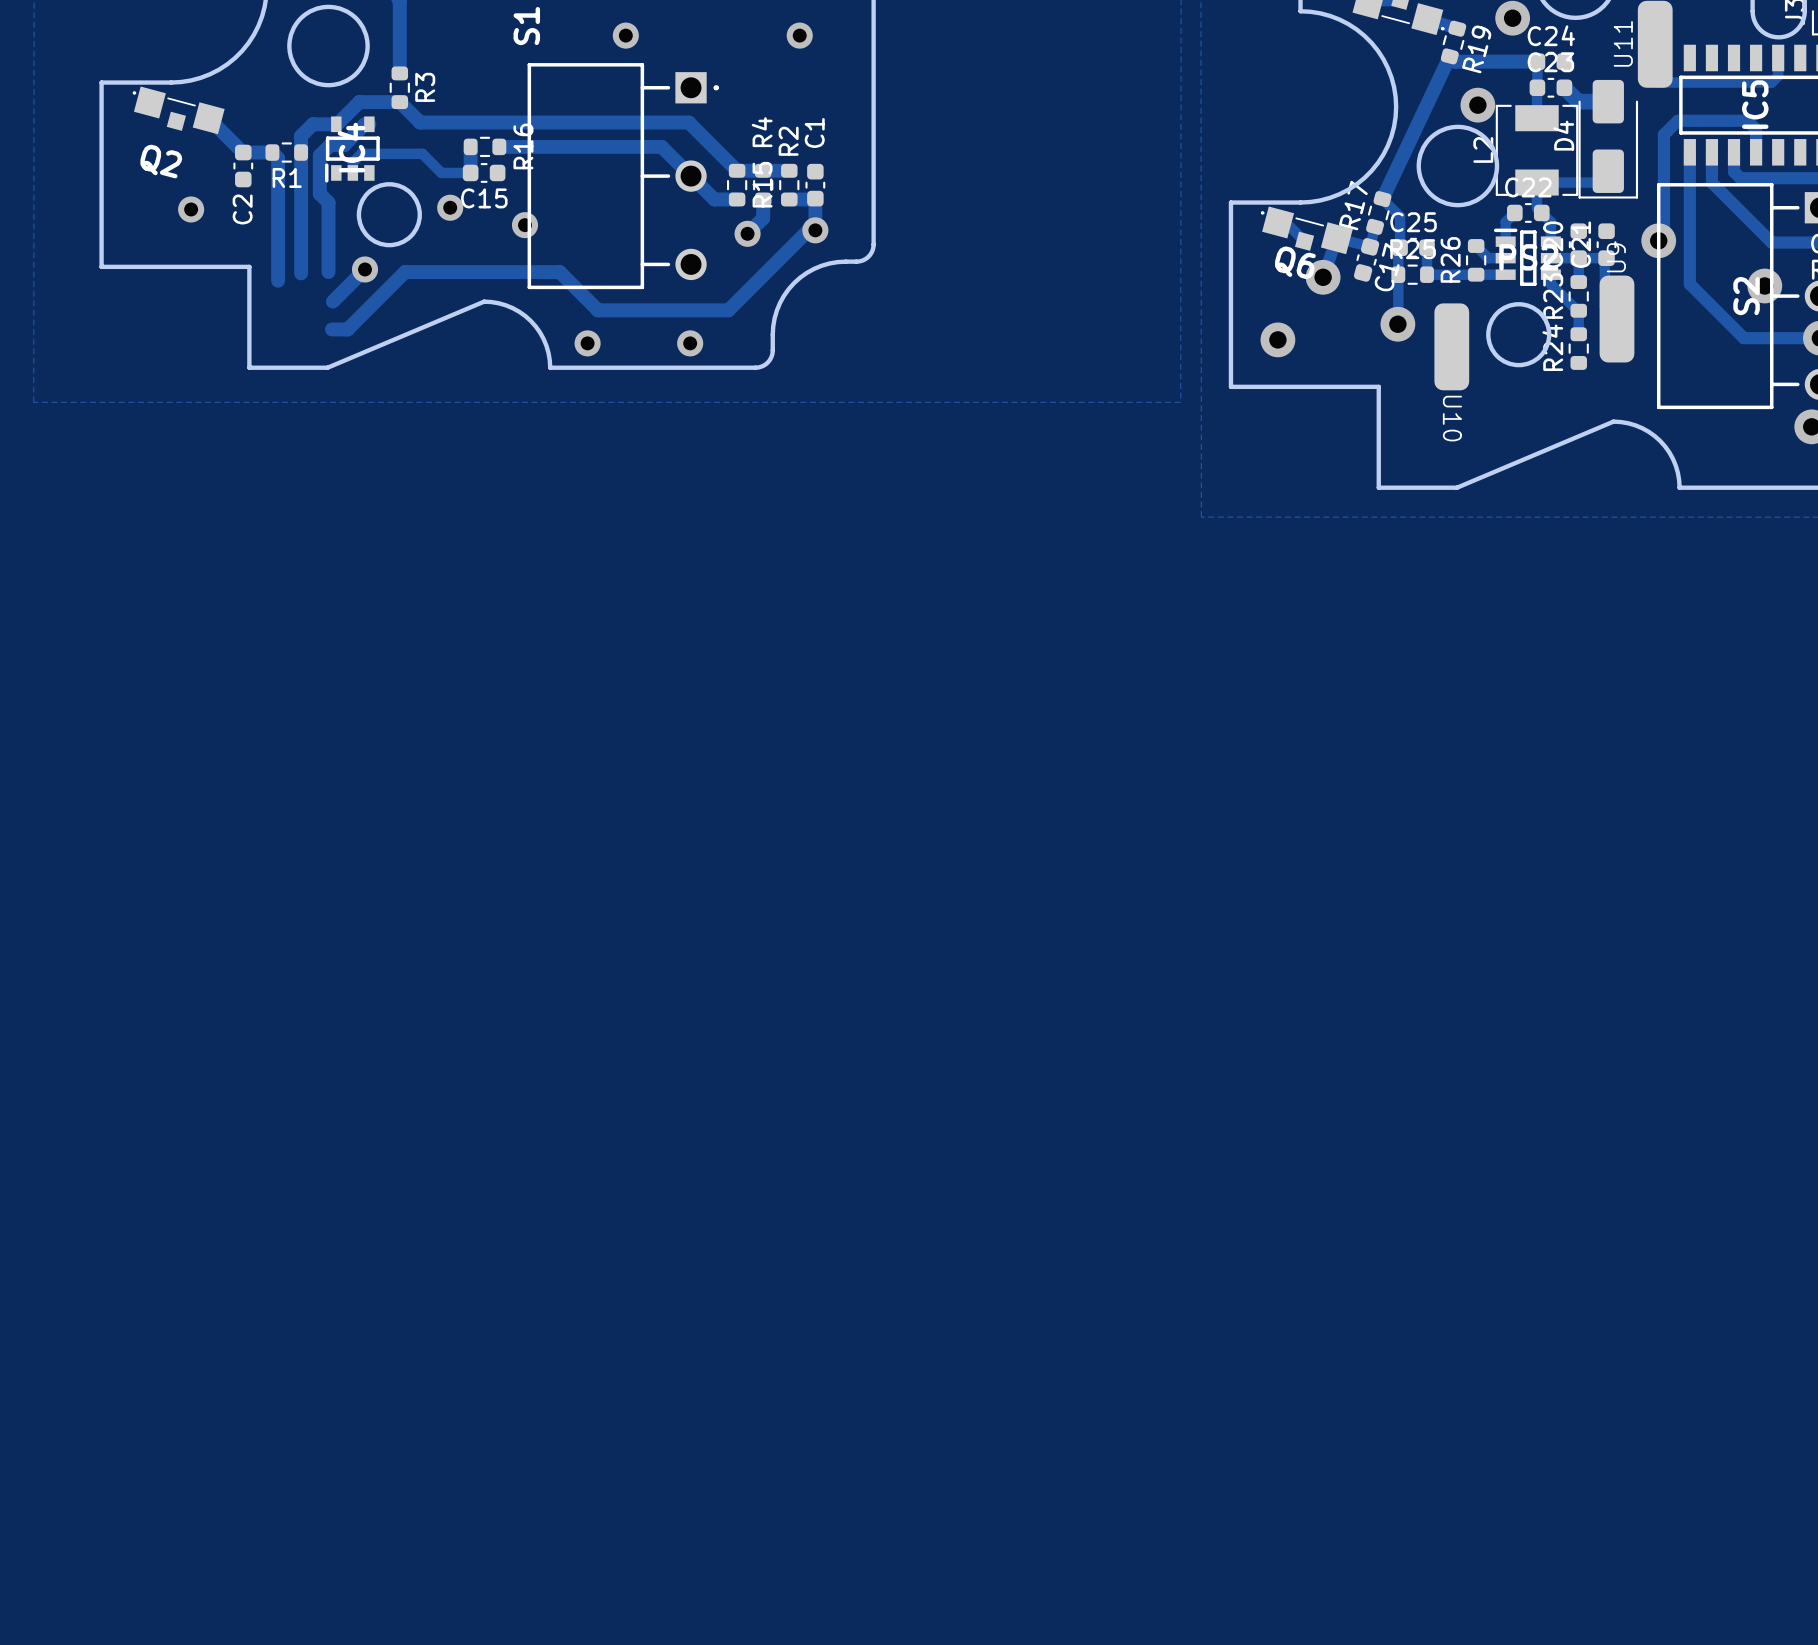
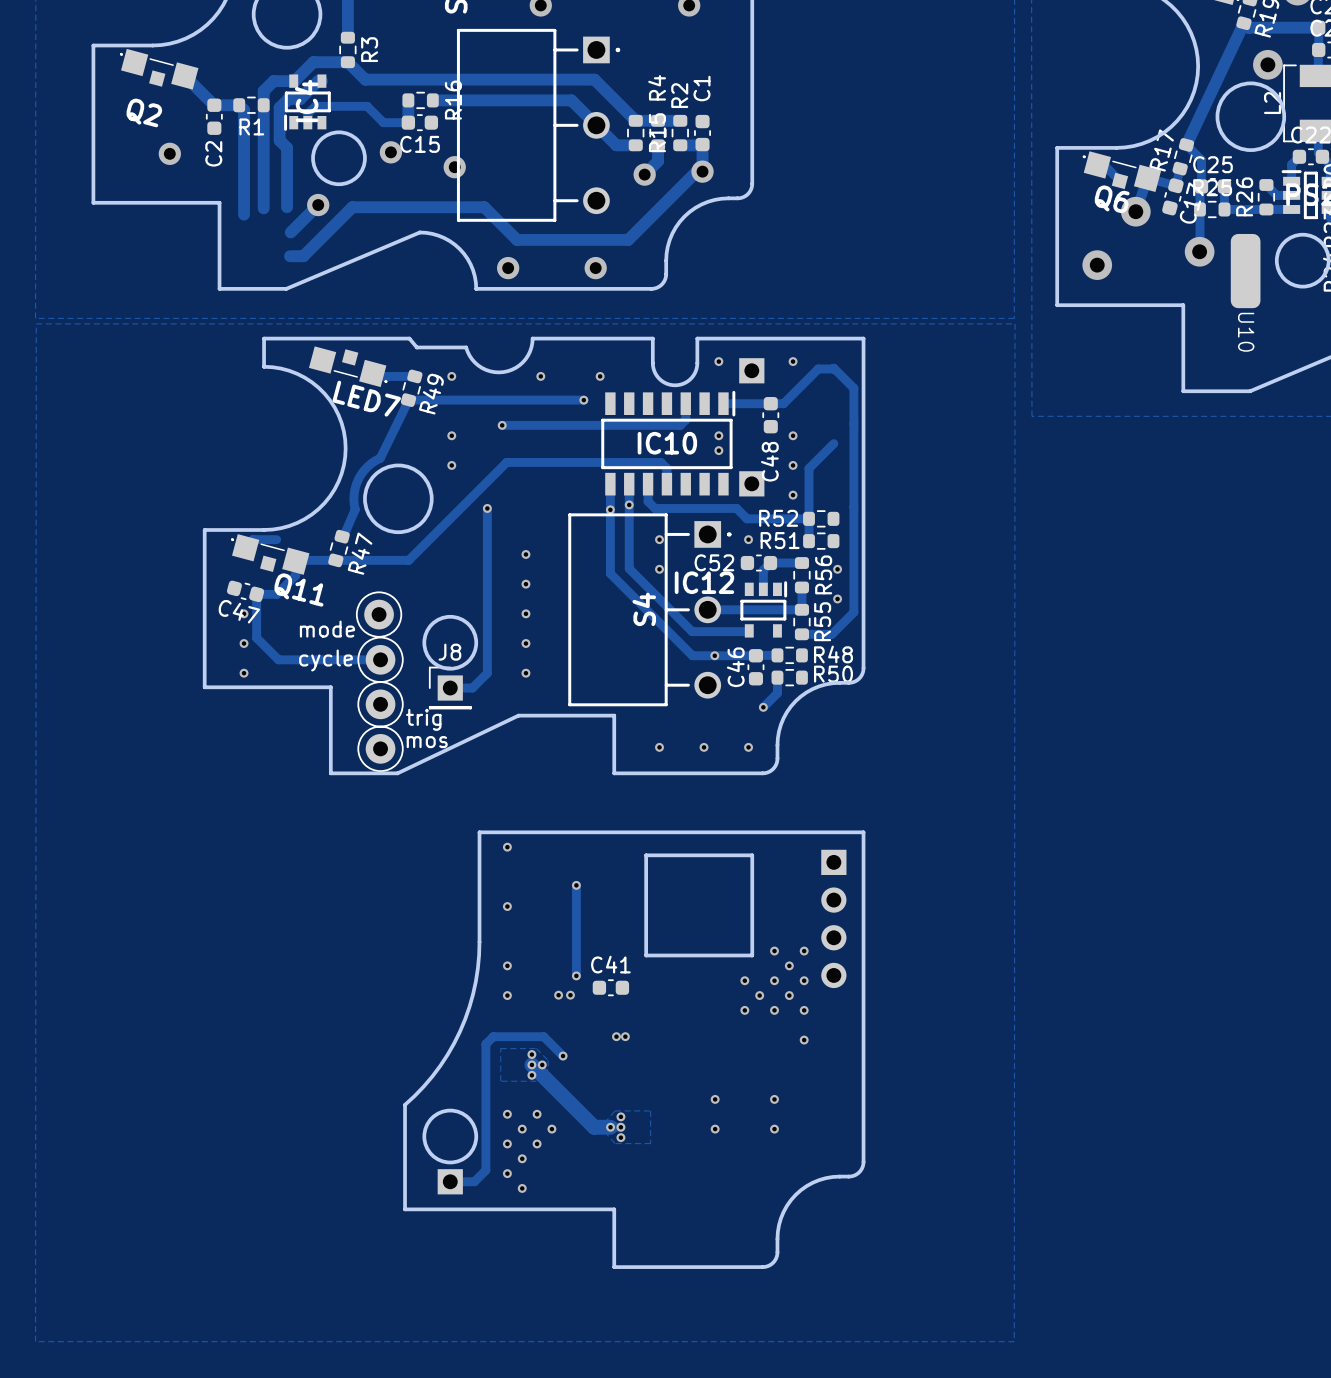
zone outline: none -> (36, 323) (35, 1341) (1014, 1341) (1015, 323) (36, 323)
board edge: none -> (264, 338) (409, 338) (416, 347) (466, 347) (472, 359) (478, 365) (485, 369) (498, 372) (511, 369) (522, 362) (530, 351) (532, 338) (652, 338) (652, 365) (655, 373) (662, 381) (675, 385) (687, 381) (694, 373) (697, 365) (697, 338) (863, 338) (863, 668) (861, 676) (851, 682) (832, 683) (819, 686) (806, 692) (795, 701) (787, 711) (780, 724) (776, 764) (765, 772) (614, 773) (614, 715) (518, 715) (397, 773) (330, 773) (330, 687) (204, 687) (204, 529) (272, 529) (297, 522) (312, 514) (324, 502) (338, 481) (343, 465) (345, 439) (341, 423) (334, 407) (324, 393) (304, 377) (289, 370) (264, 366) (264, 338)
via: none -> (718, 361)
via: none -> (793, 361)
LED7: none -> (348, 366)
part: none -> (751, 370)
track: none -> (372, 373) (375, 376) (414, 376)
via: none -> (451, 376)
via: none -> (540, 376)
via: none -> (600, 376)
R49: none -> (411, 388)
track: none -> (408, 400) (583, 400)
track: none -> (408, 400) (380, 458) (367, 466) (358, 479) (354, 494) (355, 509) (343, 536)
via: none -> (583, 400)
track: none -> (685, 403) (685, 419) (680, 425) (502, 425)
track: none -> (723, 403) (783, 403) (818, 368) (833, 368) (853, 388) (853, 612) (831, 634) (801, 634)
C48: none -> (770, 415)
via: none -> (502, 425)
via: none -> (451, 435)
via: none -> (718, 435)
via: none -> (793, 435)
IC10: none -> (668, 443)
track: none -> (833, 443) (809, 468) (809, 541)
via: none -> (718, 450)
round board edge: none -> [363, 463, 434, 535]
via: none -> (451, 465)
via: none -> (793, 465)
track: none -> (610, 484) (610, 573) (692, 655) (777, 655)
track: none -> (629, 484) (629, 568) (692, 631) (749, 630)
track: none -> (648, 484) (648, 501) (655, 508) (736, 508) (747, 518) (809, 518)
track: none -> (666, 484) (666, 468) (660, 462) (506, 462) (408, 560) (296, 560) (295, 575) (276, 594) (256, 594) (256, 637) (278, 659) (380, 659)
part: none -> (751, 483)
via: none -> (793, 495)
via: none -> (629, 504)
track: none -> (487, 508) (487, 673) (472, 688) (450, 688)
via: none -> (487, 508)
via: none -> (610, 509)
R52: none -> (821, 518)
track: none -> (276, 539) (252, 539) (245, 547)
via: none -> (659, 539)
via: none -> (748, 539)
R51: none -> (821, 541)
R47: none -> (338, 548)
Q11: none -> (270, 554)
via: none -> (525, 554)
C52: none -> (758, 563)
track: none -> (801, 563) (770, 563) (763, 570) (763, 589)
via: none -> (659, 569)
via: none -> (837, 569)
R56: none -> (801, 575)
via: none -> (525, 584)
track: none -> (801, 587) (801, 609) (707, 609)
C47: none -> (245, 591)
via: none -> (837, 598)
S4: none -> (649, 609)
IC12: none -> (763, 609)
via: none -> (244, 613)
via: none -> (525, 613)
part: none -> (379, 614)
round board edge: none -> [422, 614, 479, 671]
R55: none -> (801, 622)
text: none -> mode (327, 629)
via: none -> (244, 643)
via: none -> (525, 643)
via: none -> (714, 655)
R48: none -> (789, 655)
part: none -> (380, 659)
text: none -> cycle (326, 660)
C46: none -> (755, 667)
via: none -> (244, 673)
via: none -> (525, 673)
track: none -> (777, 677) (777, 693) (763, 707)
R50: none -> (789, 677)
J8: none -> (450, 688)
part: none -> (380, 704)
via: none -> (763, 707)
text: none -> trig (423, 719)
text: none -> mos (427, 742)
via: none -> (659, 747)
via: none -> (704, 747)
via: none -> (748, 747)
part: none -> (380, 748)
board edge: none -> (479, 832) (479, 942) (475, 981) (465, 1019) (447, 1054) (423, 1086) (405, 1104) (405, 1209) (614, 1209) (614, 1267) (762, 1267) (770, 1264) (777, 1255) (777, 1231) (780, 1218) (787, 1205) (795, 1194) (806, 1186) (819, 1180) (855, 1175) (863, 1165) (863, 832) (479, 832)
via: none -> (507, 847)
board edge: none -> (646, 855) (752, 855) (752, 955) (646, 955) (646, 855)
track: none -> (576, 885) (576, 975)
via: none -> (576, 885)
via: none -> (507, 906)
part: none -> (833, 918)
via: none -> (774, 951)
via: none -> (804, 951)
via: none -> (507, 965)
via: none -> (789, 965)
via: none -> (576, 975)
via: none -> (744, 980)
via: none -> (774, 980)
via: none -> (804, 980)
C41: none -> (610, 987)
via: none -> (507, 995)
via: none -> (558, 995)
via: none -> (570, 995)
via: none -> (759, 995)
via: none -> (789, 995)
via: none -> (744, 1010)
via: none -> (774, 1010)
via: none -> (804, 1010)
via: none -> (616, 1036)
via: none -> (625, 1036)
via: none -> (804, 1040)
zone outline: none -> (500, 1048) (500, 1081) (536, 1081) (548, 1069) (548, 1060) (536, 1048) (500, 1048)
via: none -> (531, 1054)
track: none -> (563, 1056) (543, 1036) (493, 1036) (485, 1044) (485, 1170) (474, 1181) (450, 1181)
via: none -> (563, 1056)
track: none -> (531, 1064) (594, 1127) (620, 1127)
via: none -> (531, 1064)
via: none -> (542, 1064)
via: none -> (531, 1075)
via: none -> (715, 1099)
via: none -> (774, 1099)
round board edge: none -> [422, 1108, 479, 1165]
zone outline: none -> (614, 1110) (604, 1122) (604, 1131) (614, 1143) (650, 1143) (650, 1110) (614, 1110)
via: none -> (507, 1114)
via: none -> (537, 1114)
via: none -> (620, 1116)
via: none -> (610, 1127)
via: none -> (620, 1127)
via: none -> (522, 1129)
via: none -> (551, 1129)
via: none -> (715, 1129)
via: none -> (774, 1129)
via: none -> (620, 1137)
via: none -> (507, 1143)
via: none -> (537, 1143)
via: none -> (522, 1158)
via: none -> (507, 1173)
part: none -> (450, 1181)
via: none -> (522, 1188)

